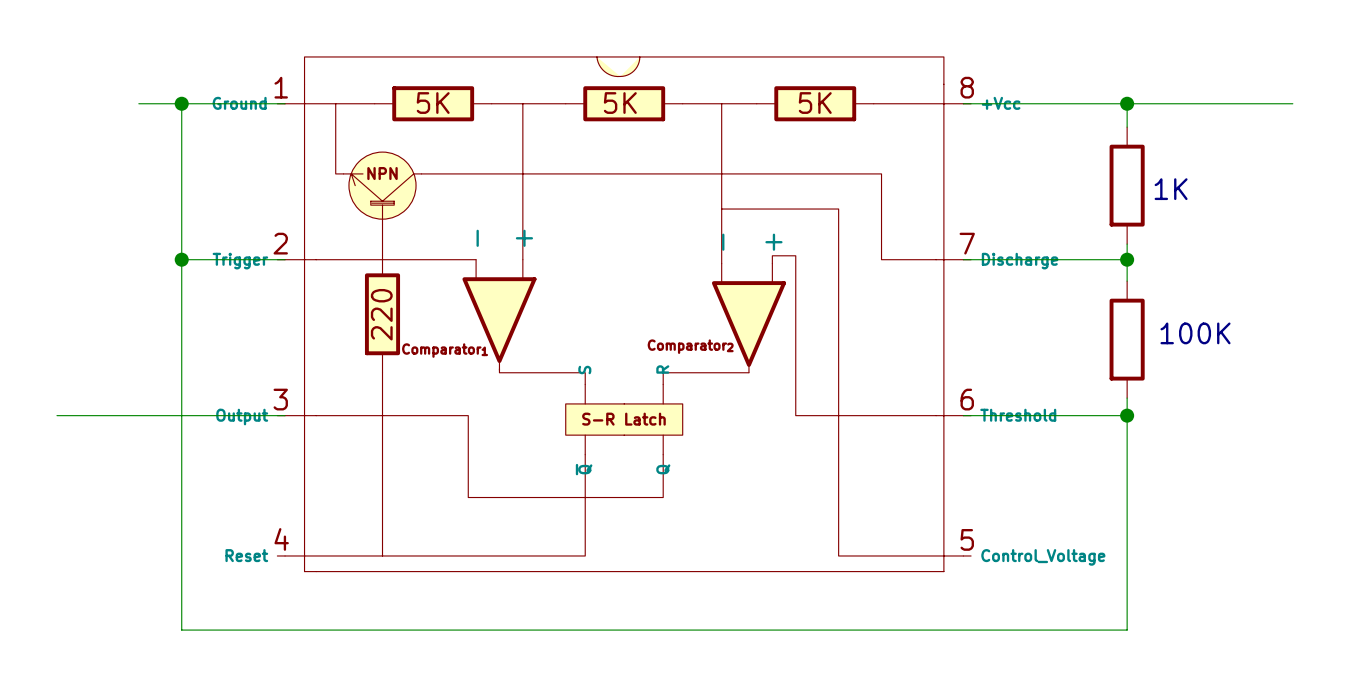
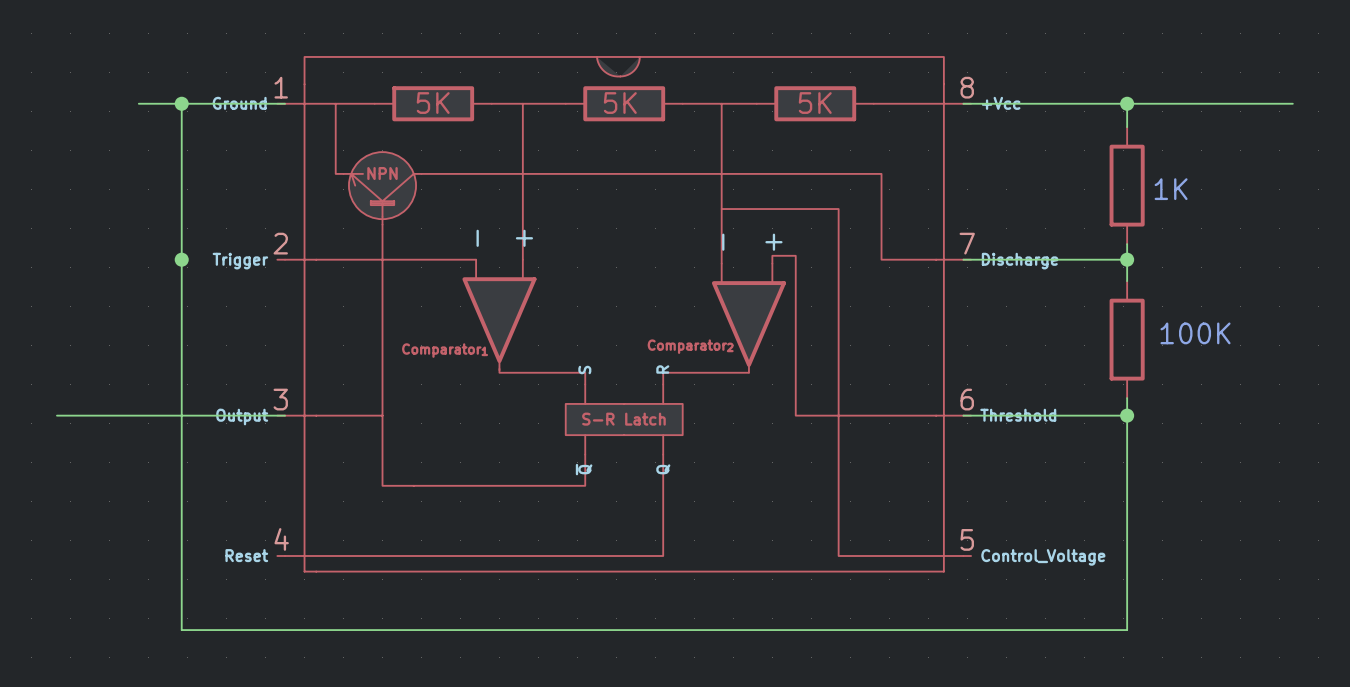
part symbol: [277, 56, 972, 572] -> [277, 56, 972, 572]
wire: (181, 259) (285, 259) -> none

